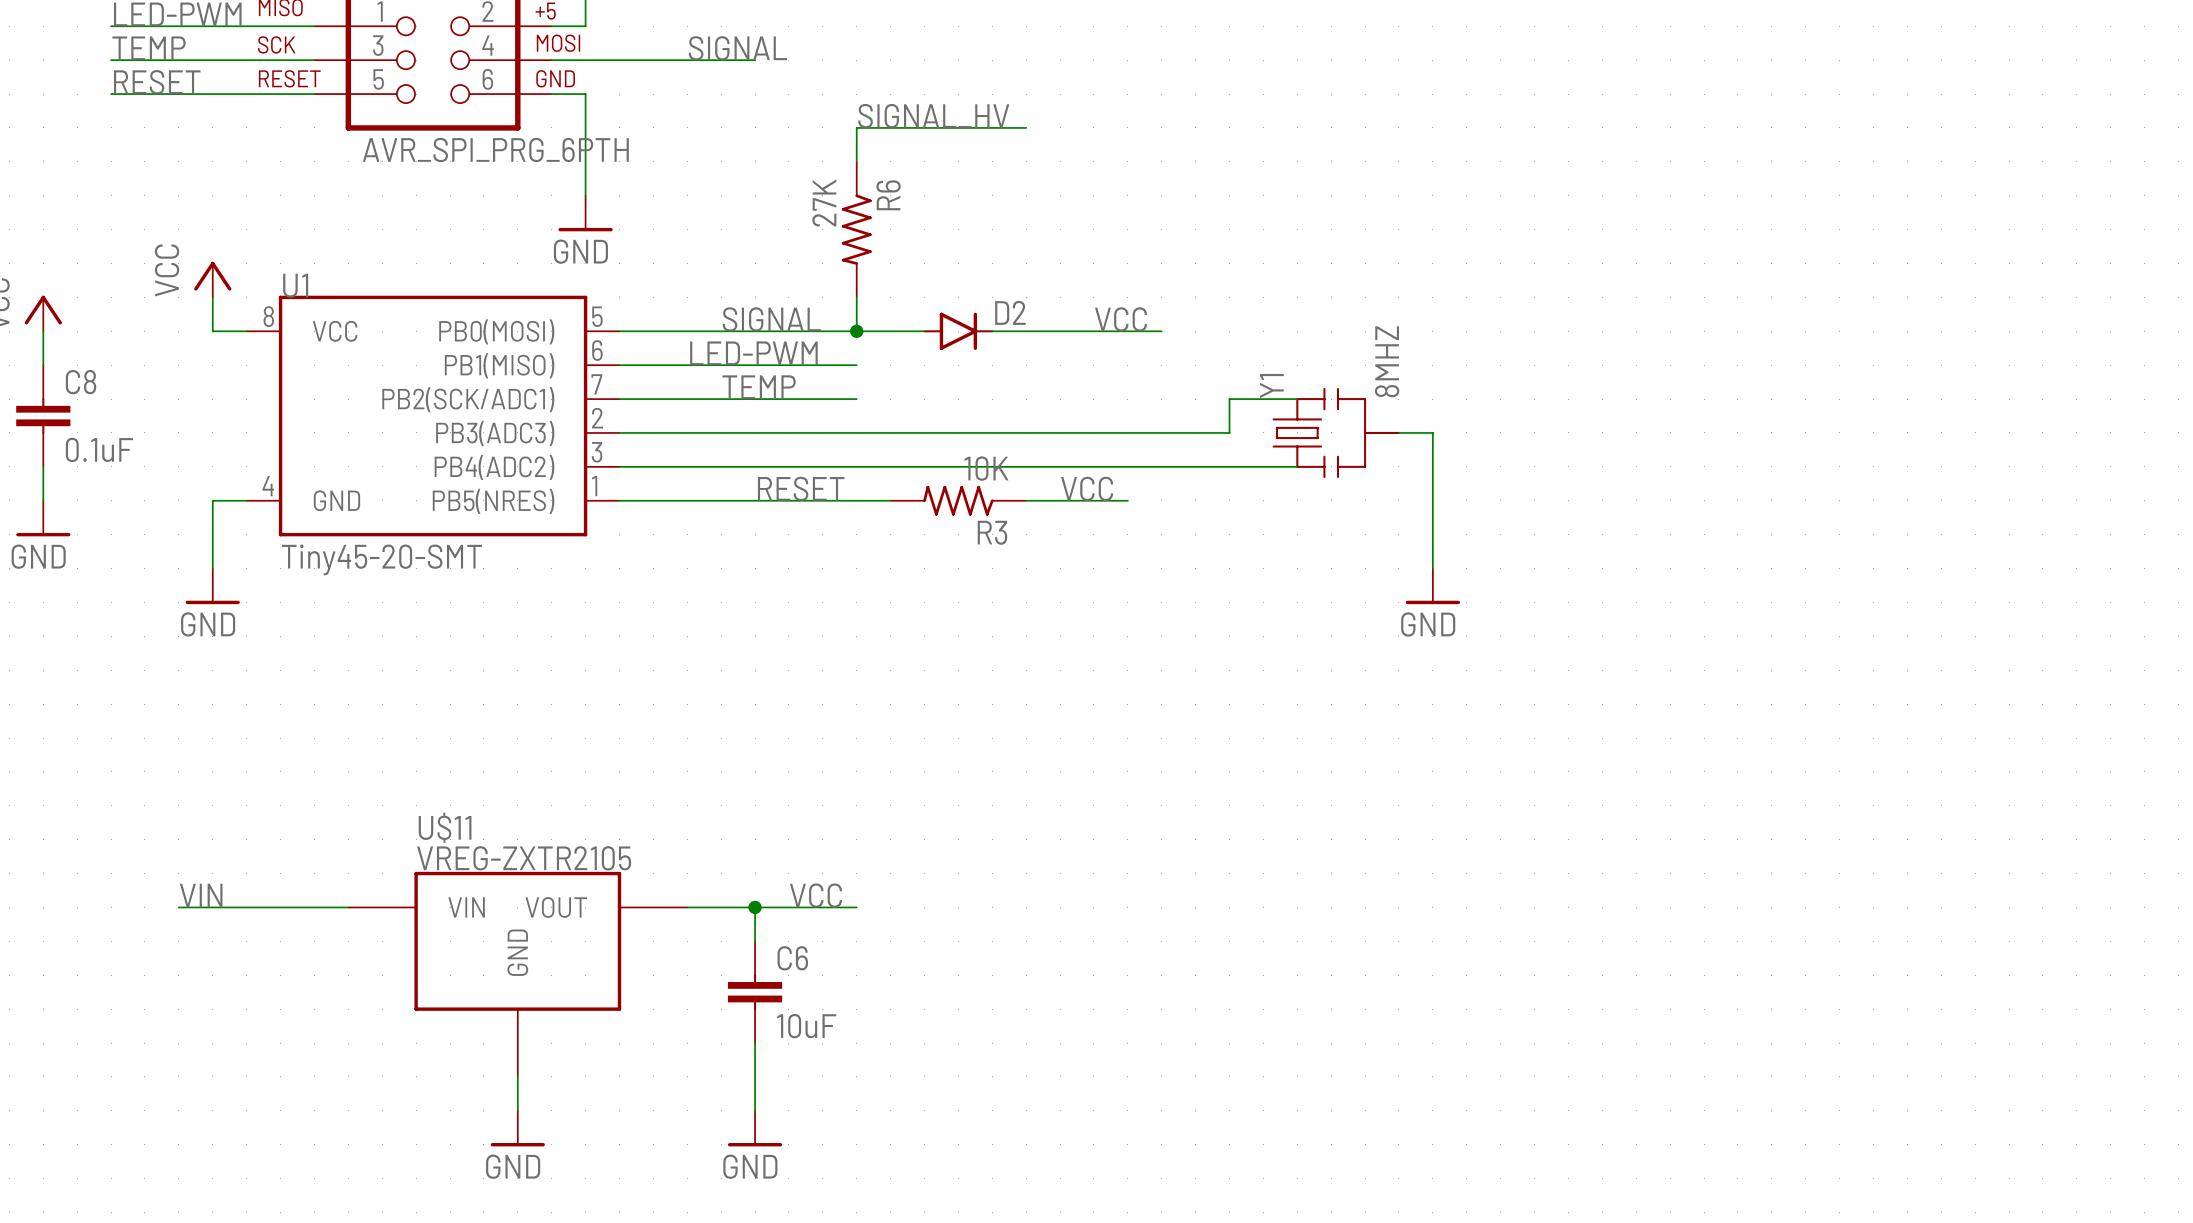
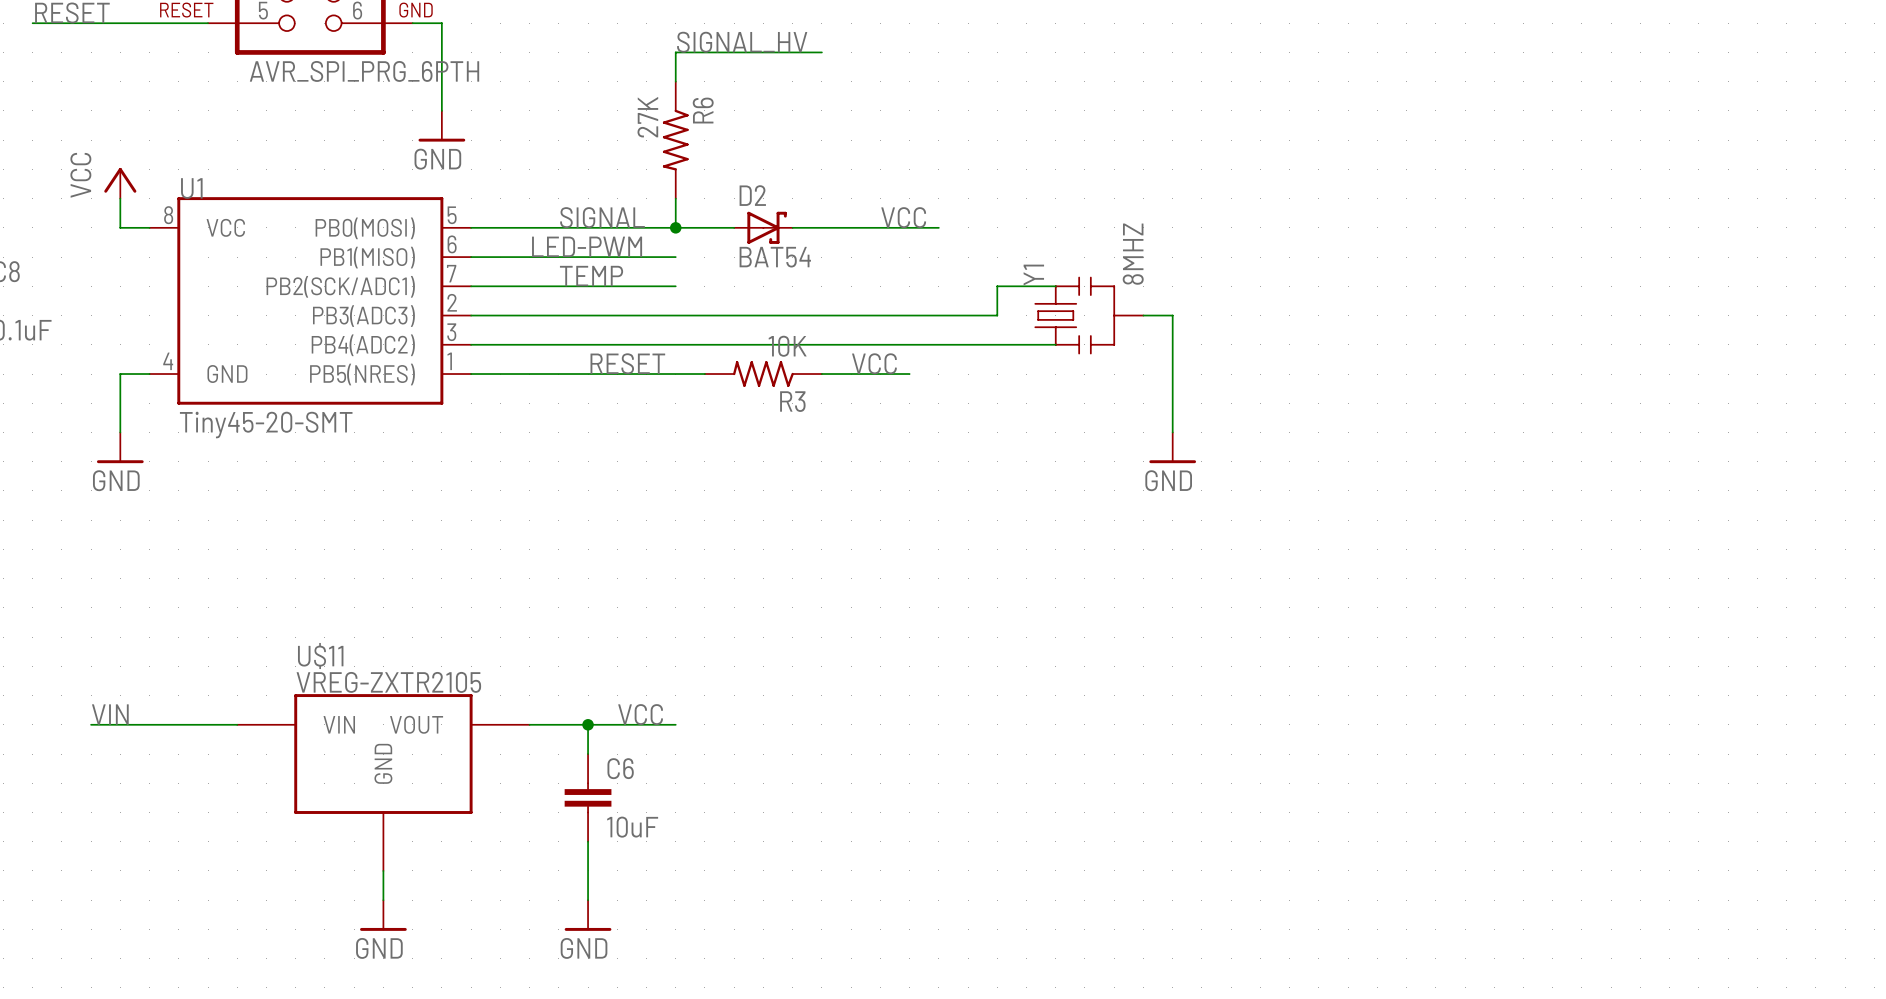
D2 symbol: [923, 312, 994, 350] -> [734, 211, 793, 244]
D2 name position: D2 (1010, 312) -> D2 (752, 195)
D2 value: none -> BAT54 (775, 257)

